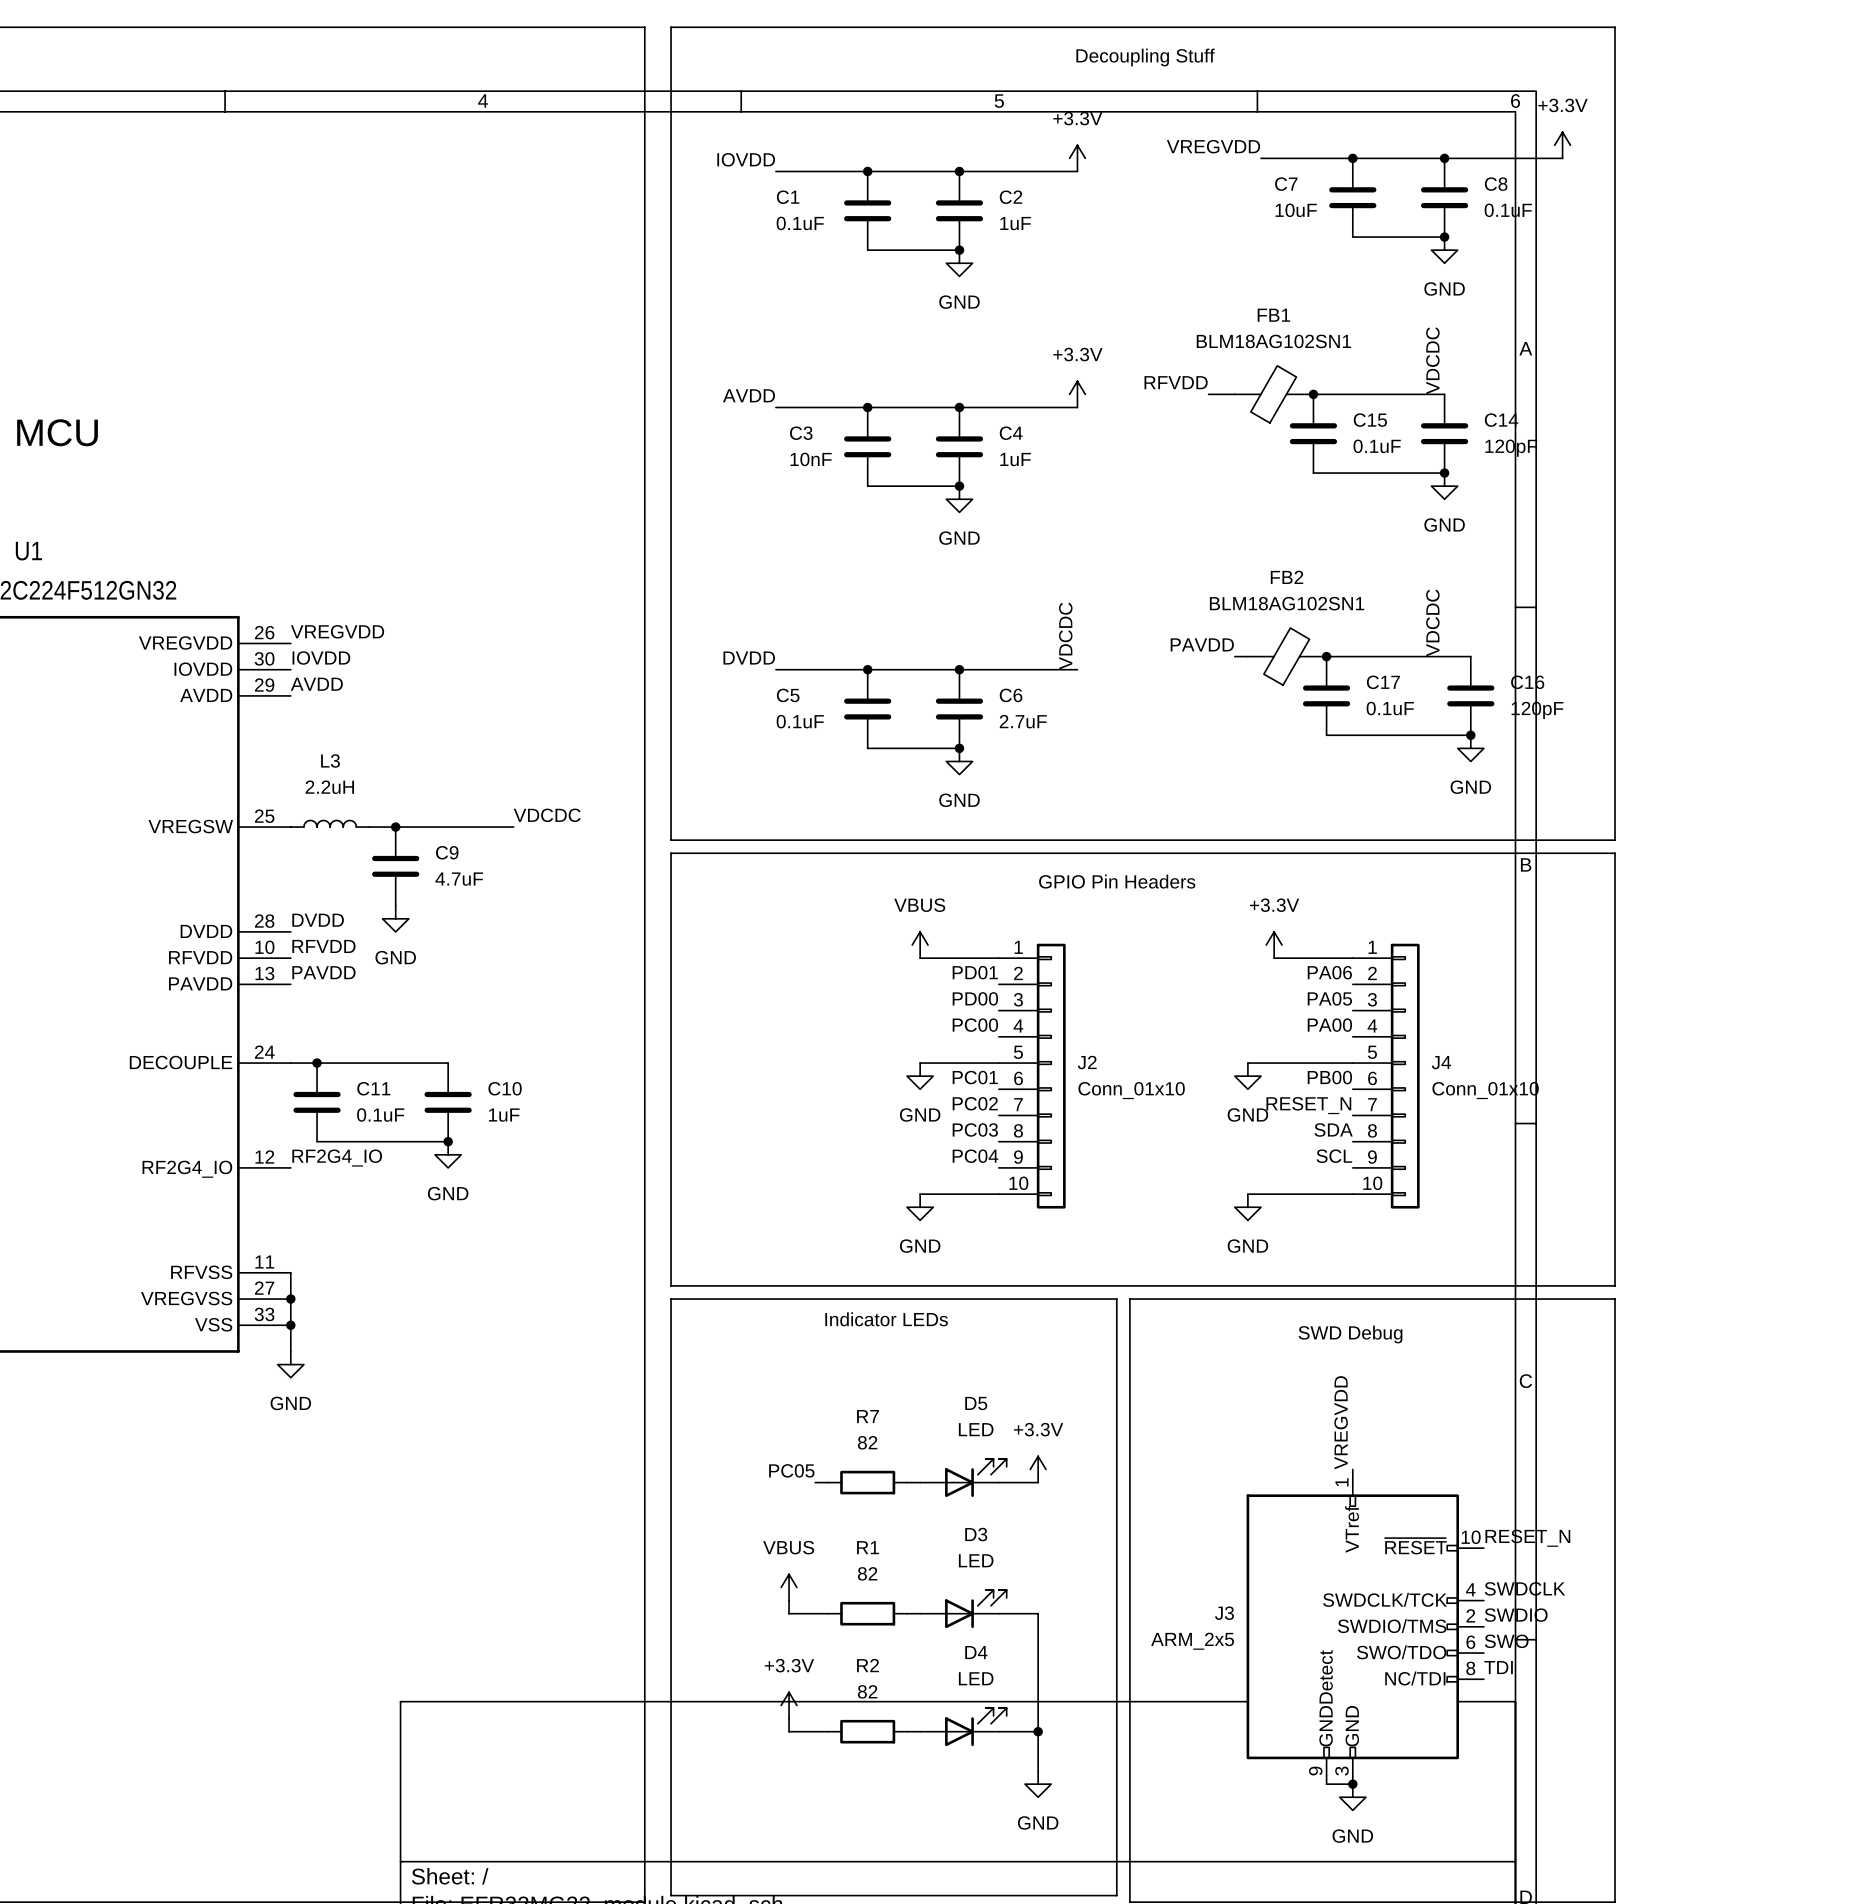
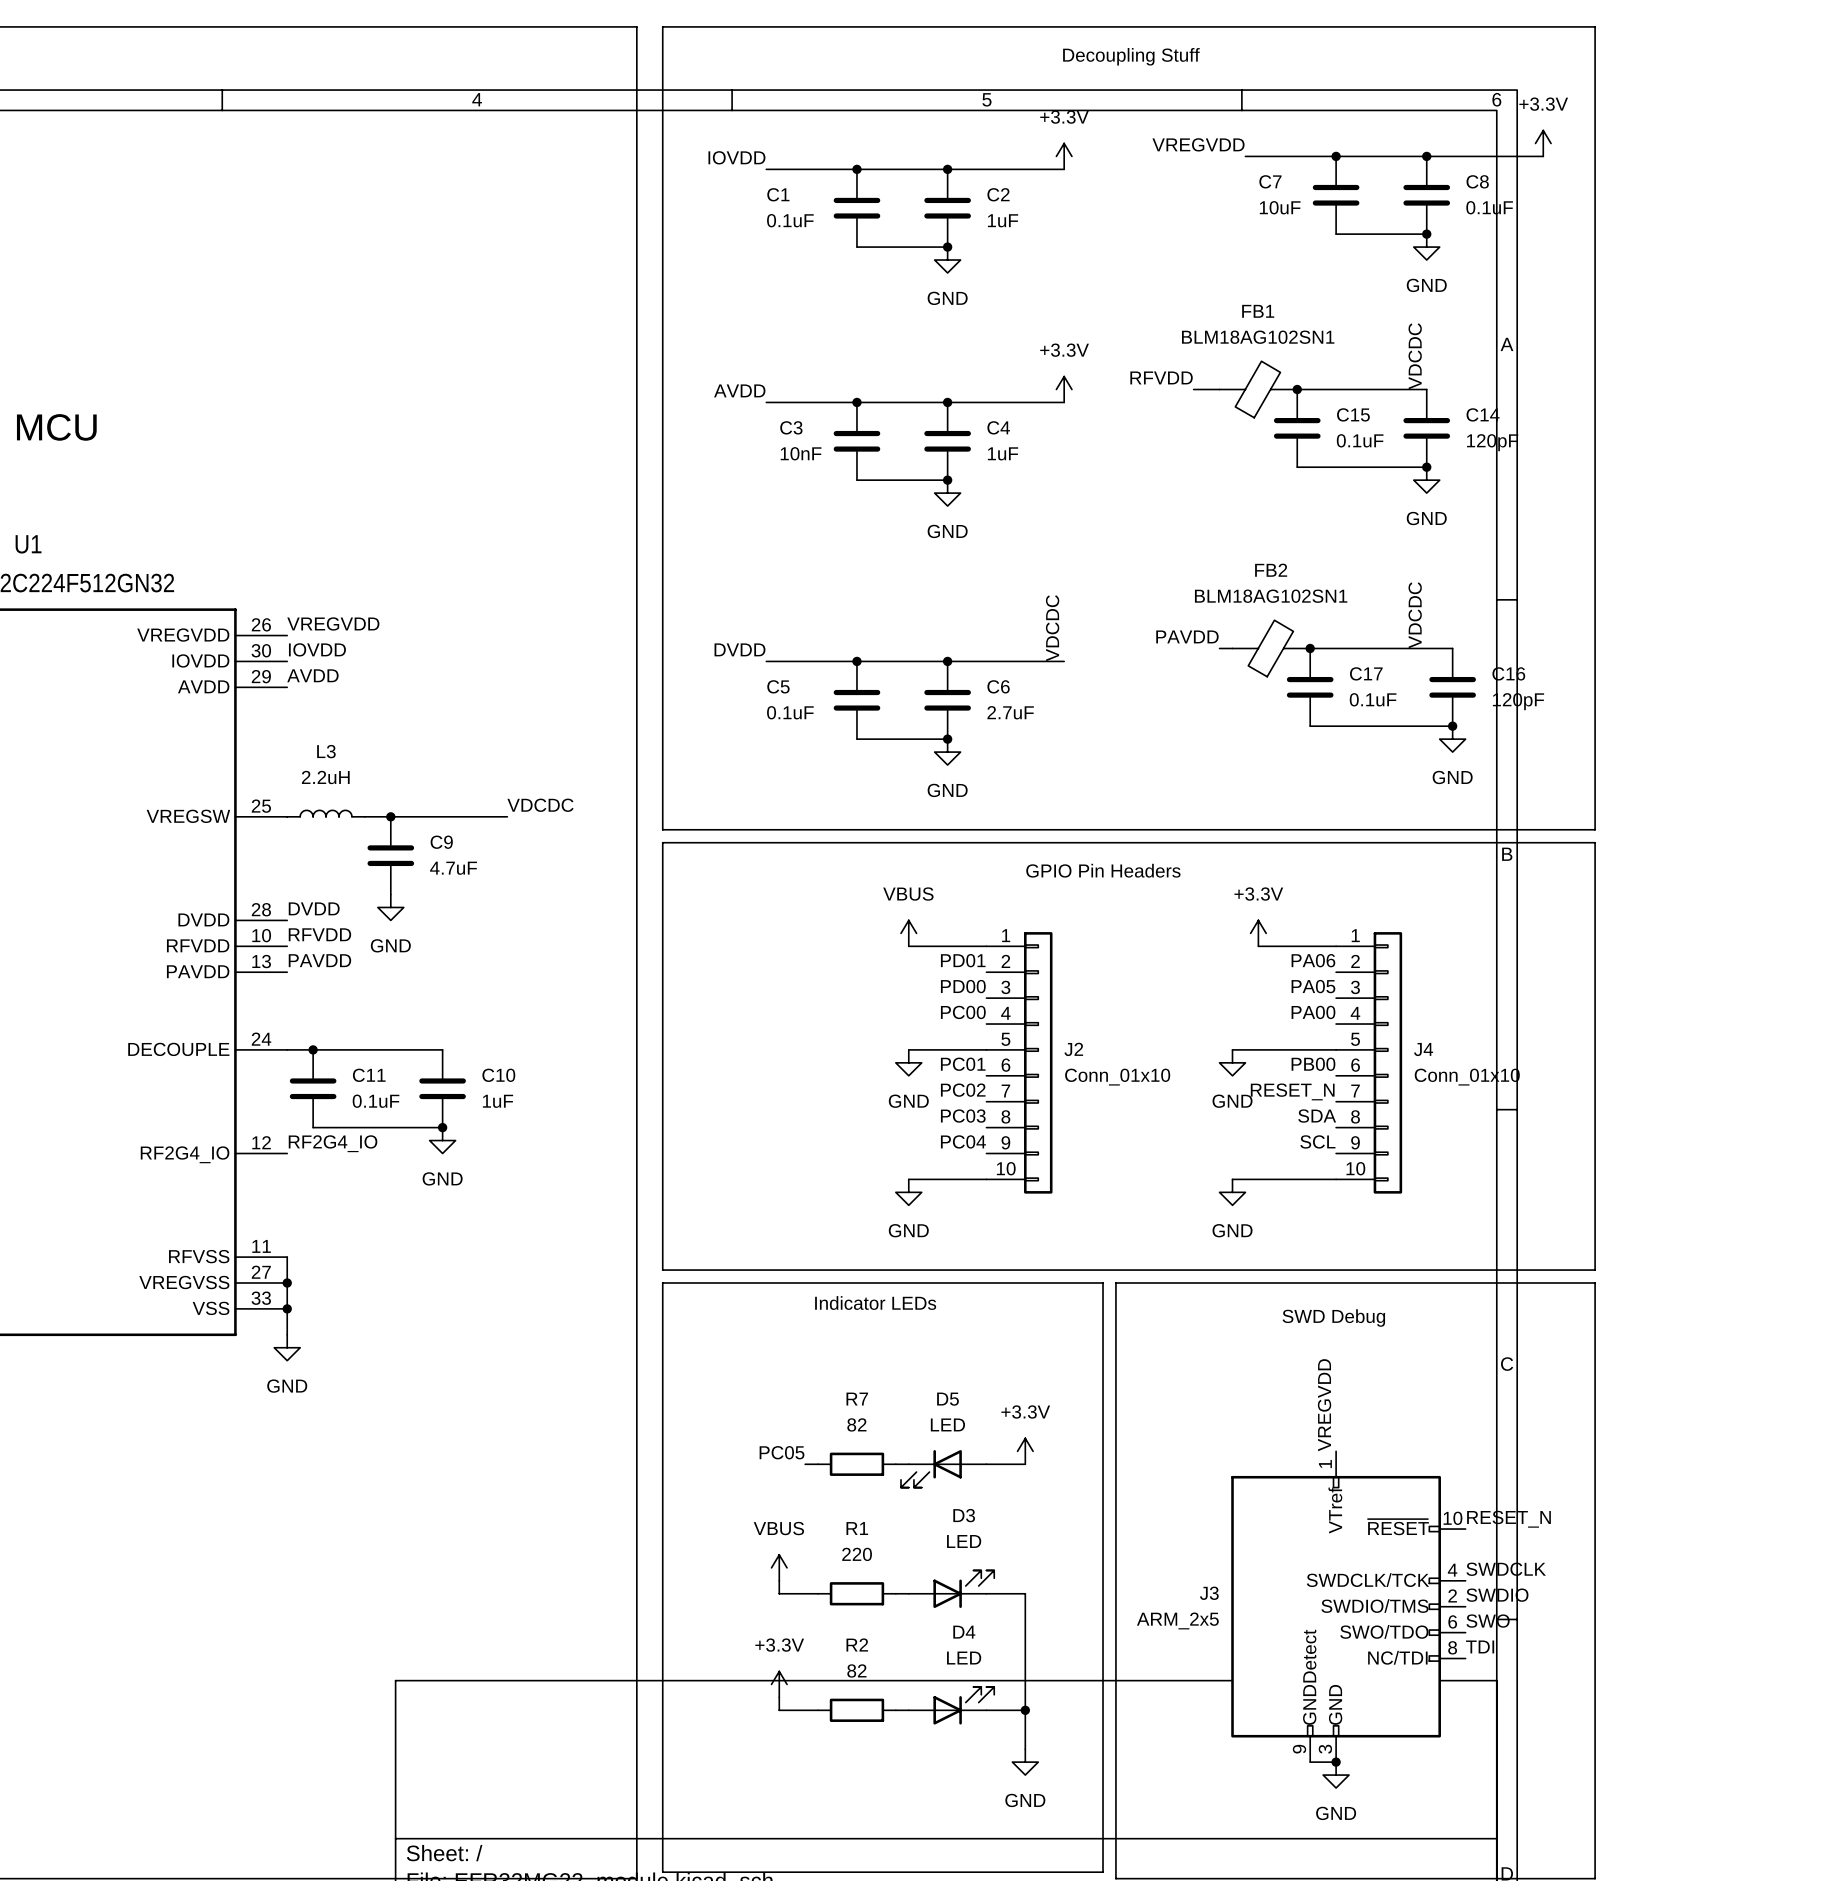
D5 rotation: 0° (975, 1478) -> 180° (931, 1468)
R1 value: 82 (867, 1573) -> 220 (857, 1554)

